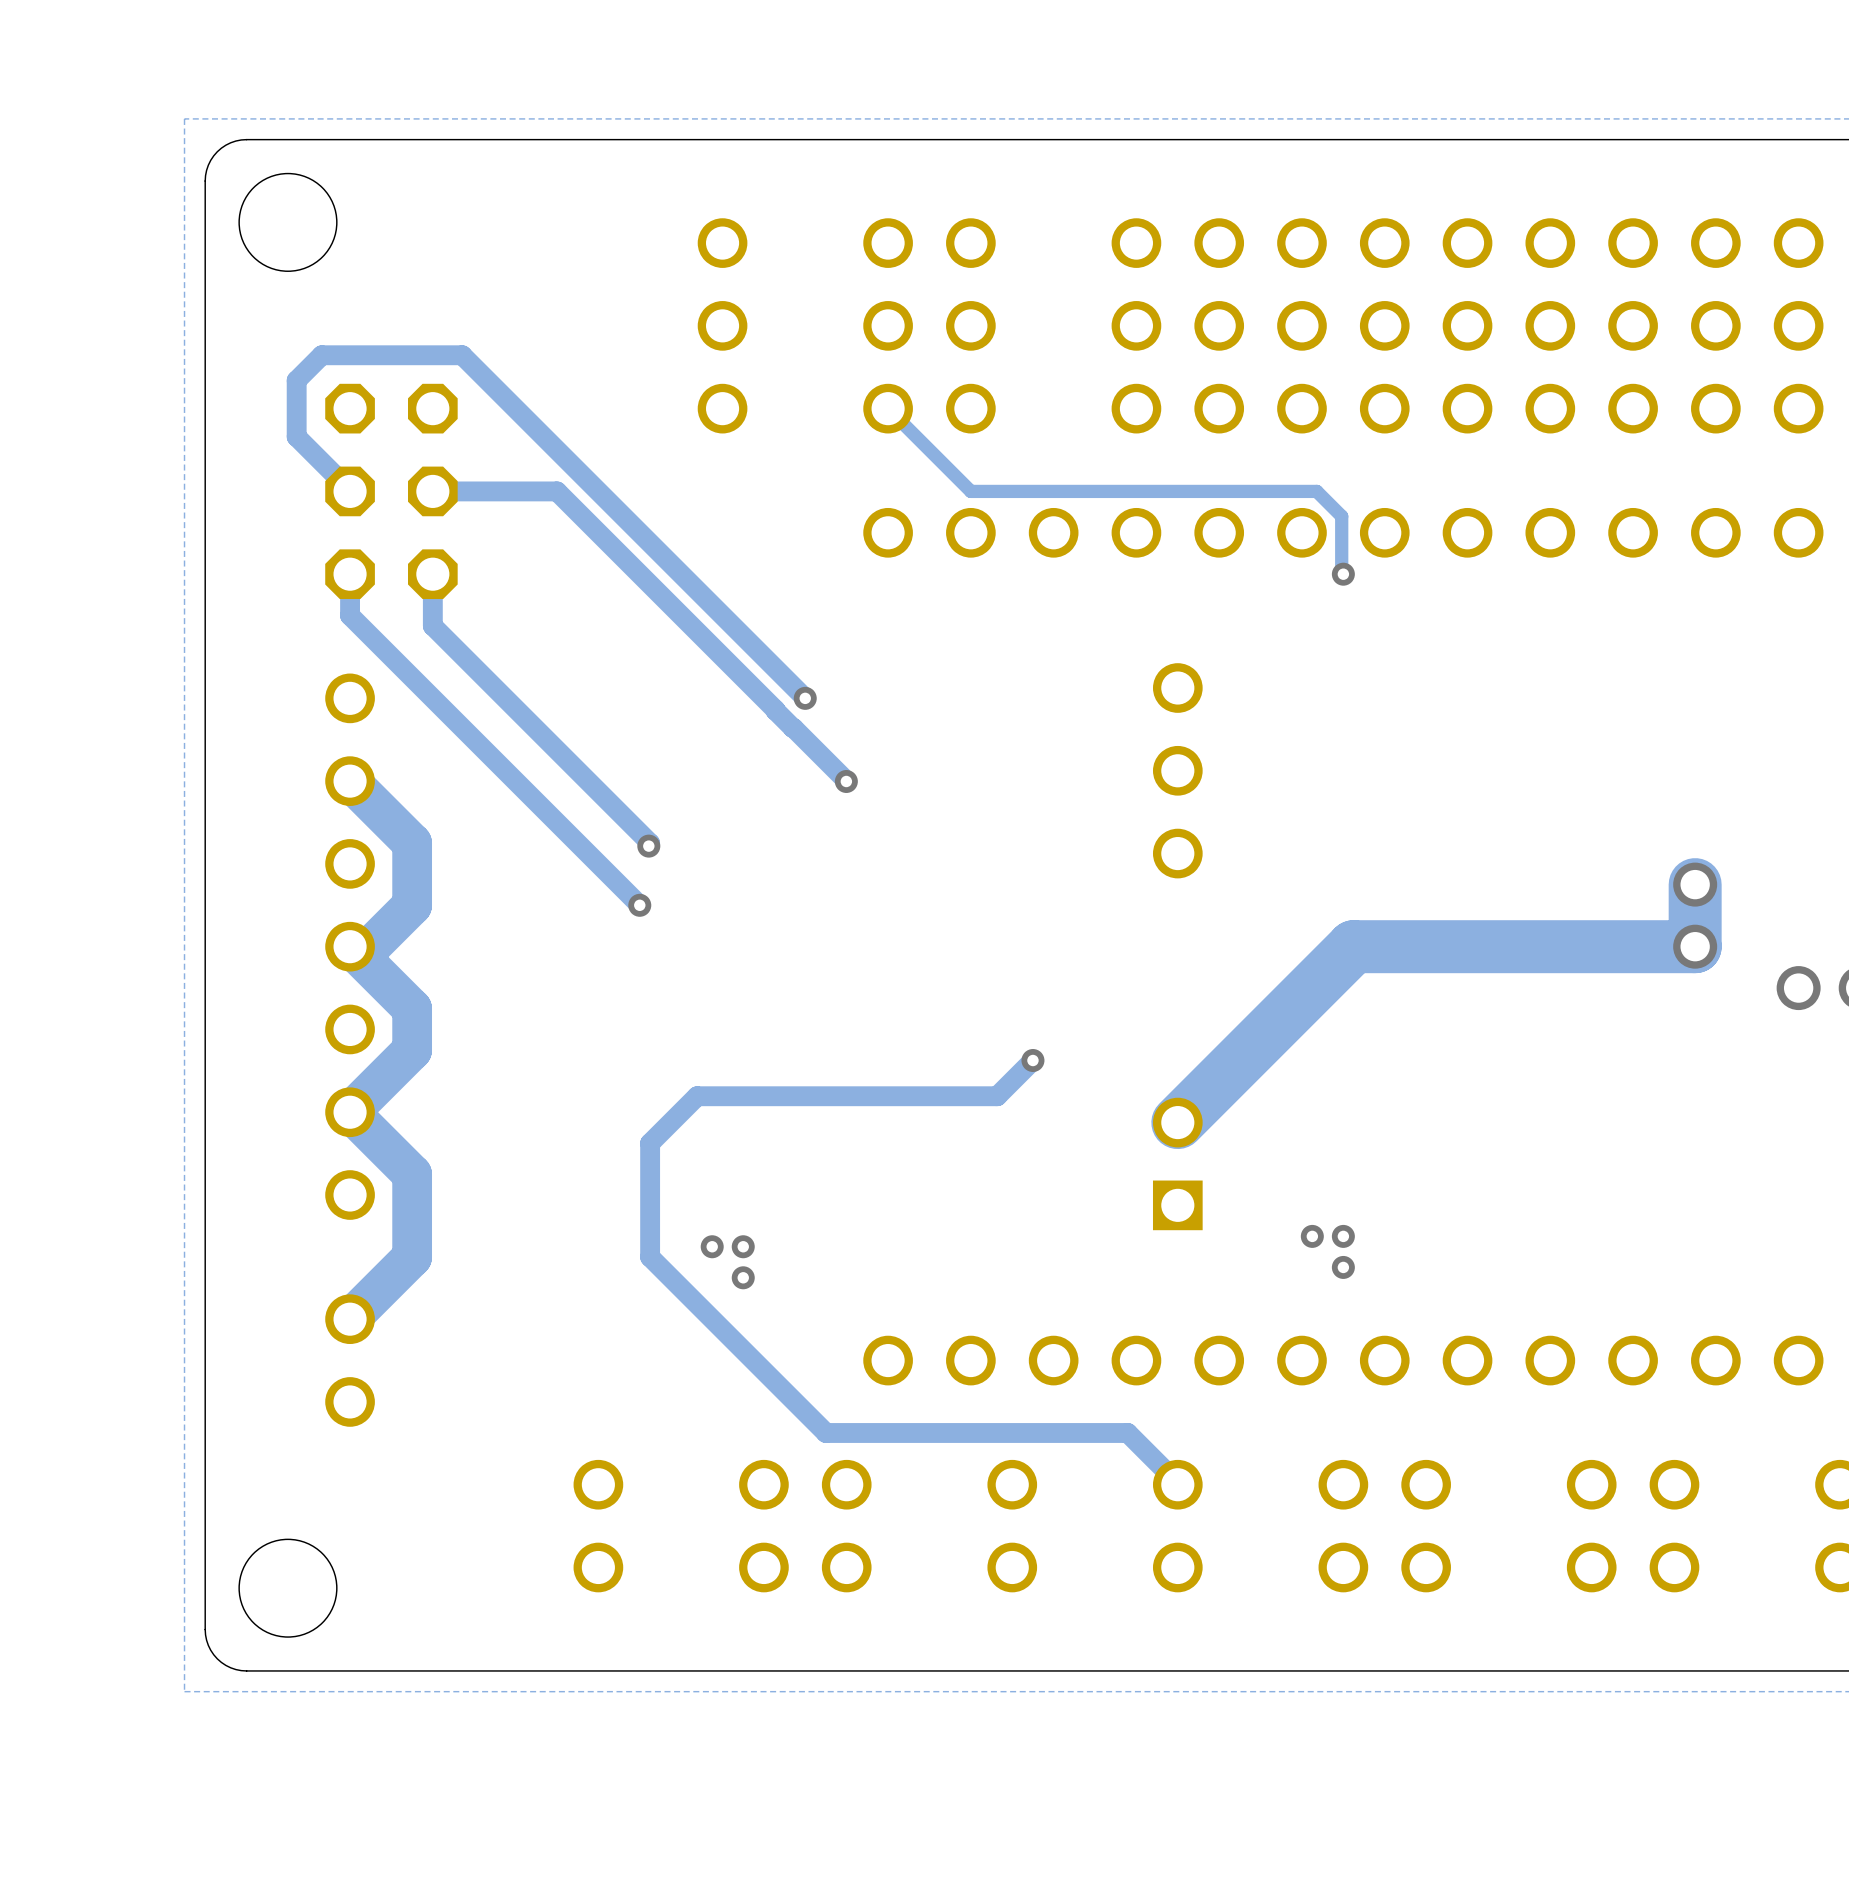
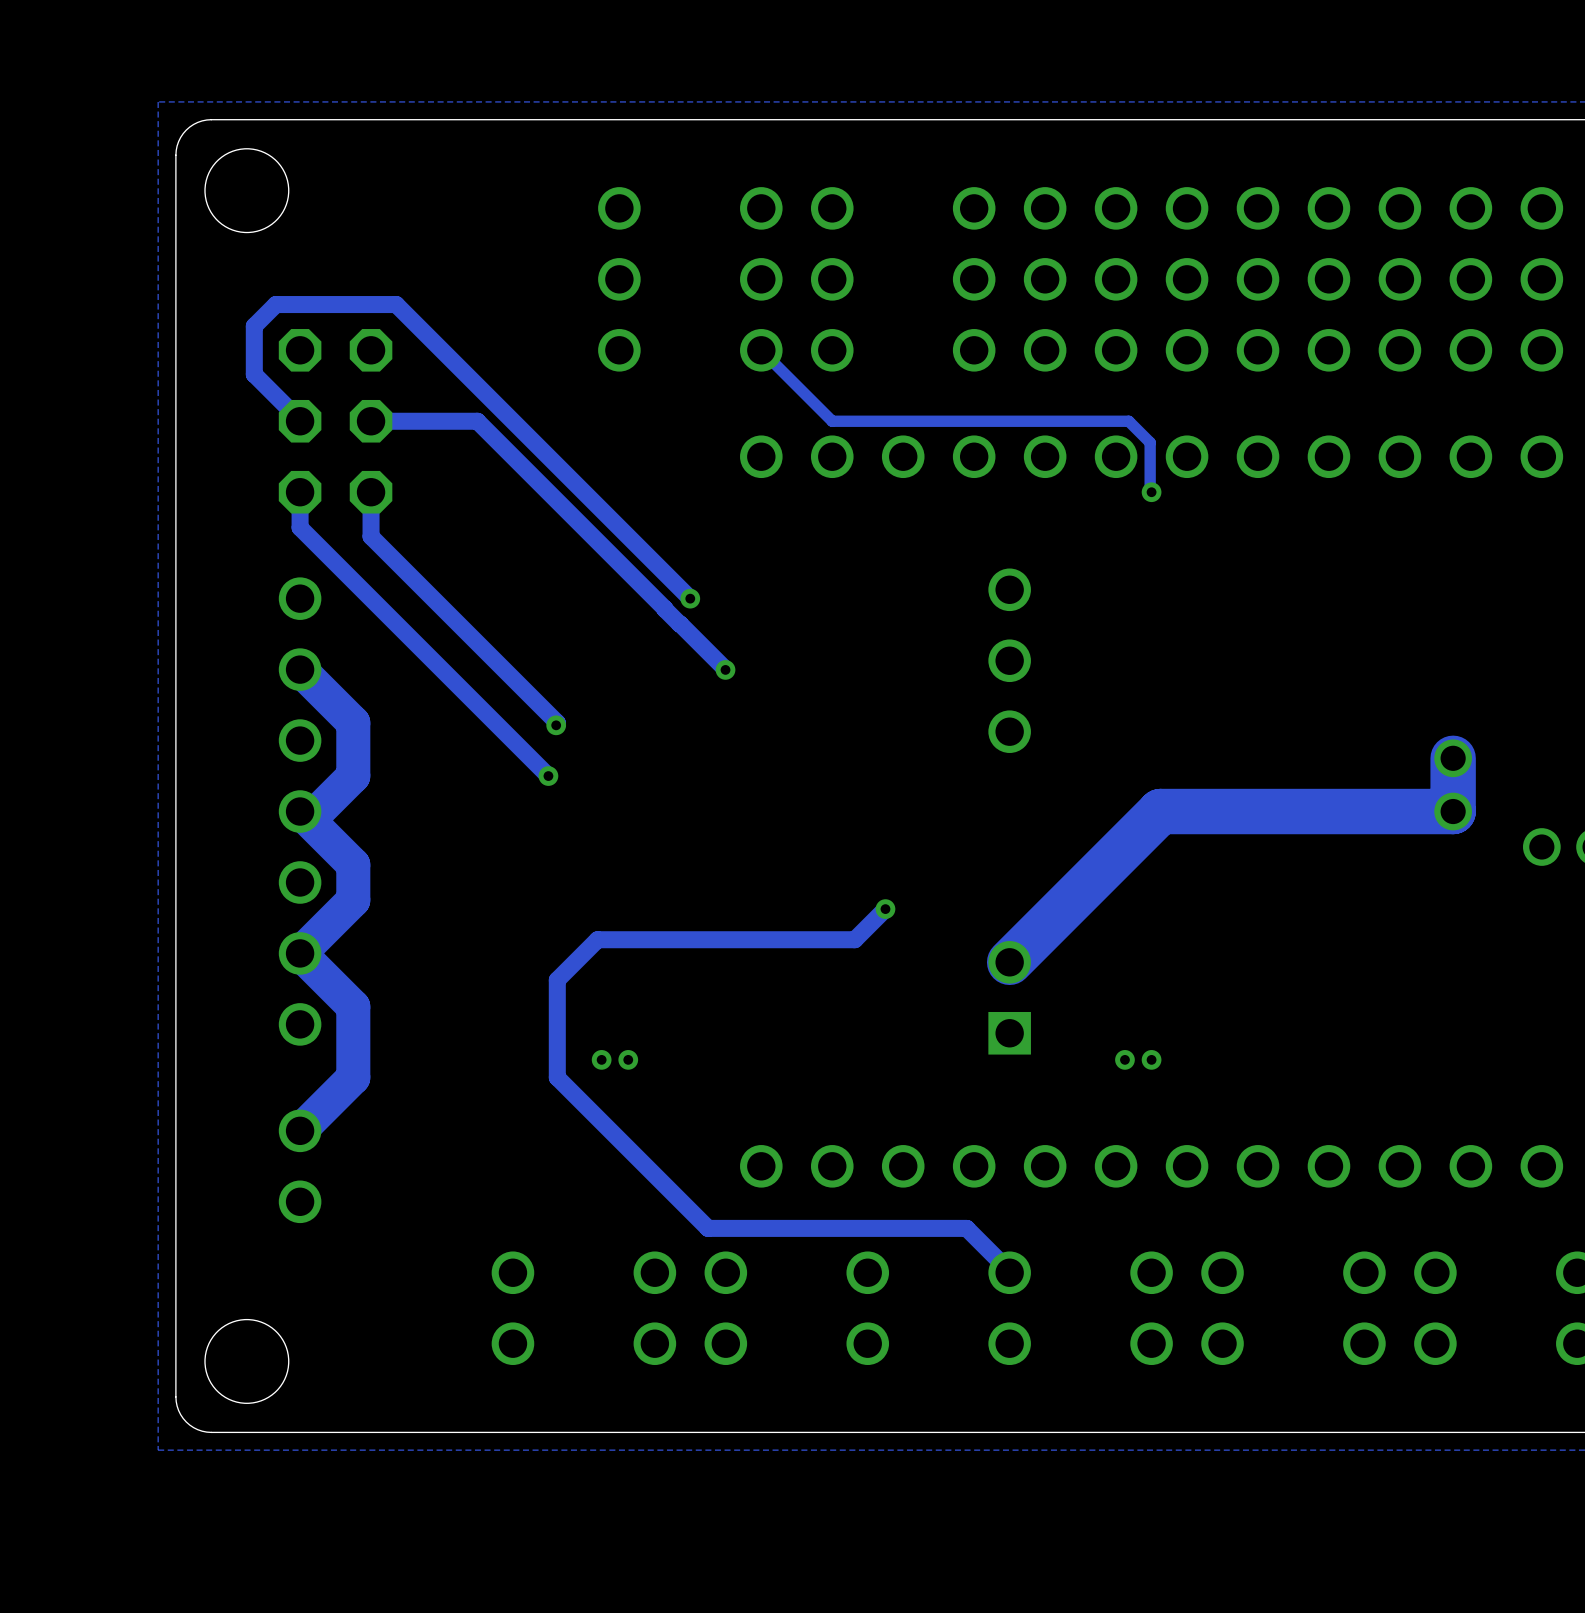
via: none -> (601, 1059)
via: none -> (628, 1059)
via: (712, 1246) -> none
via: (743, 1246) -> none
via: (1343, 1267) -> none
via: (743, 1277) -> none

